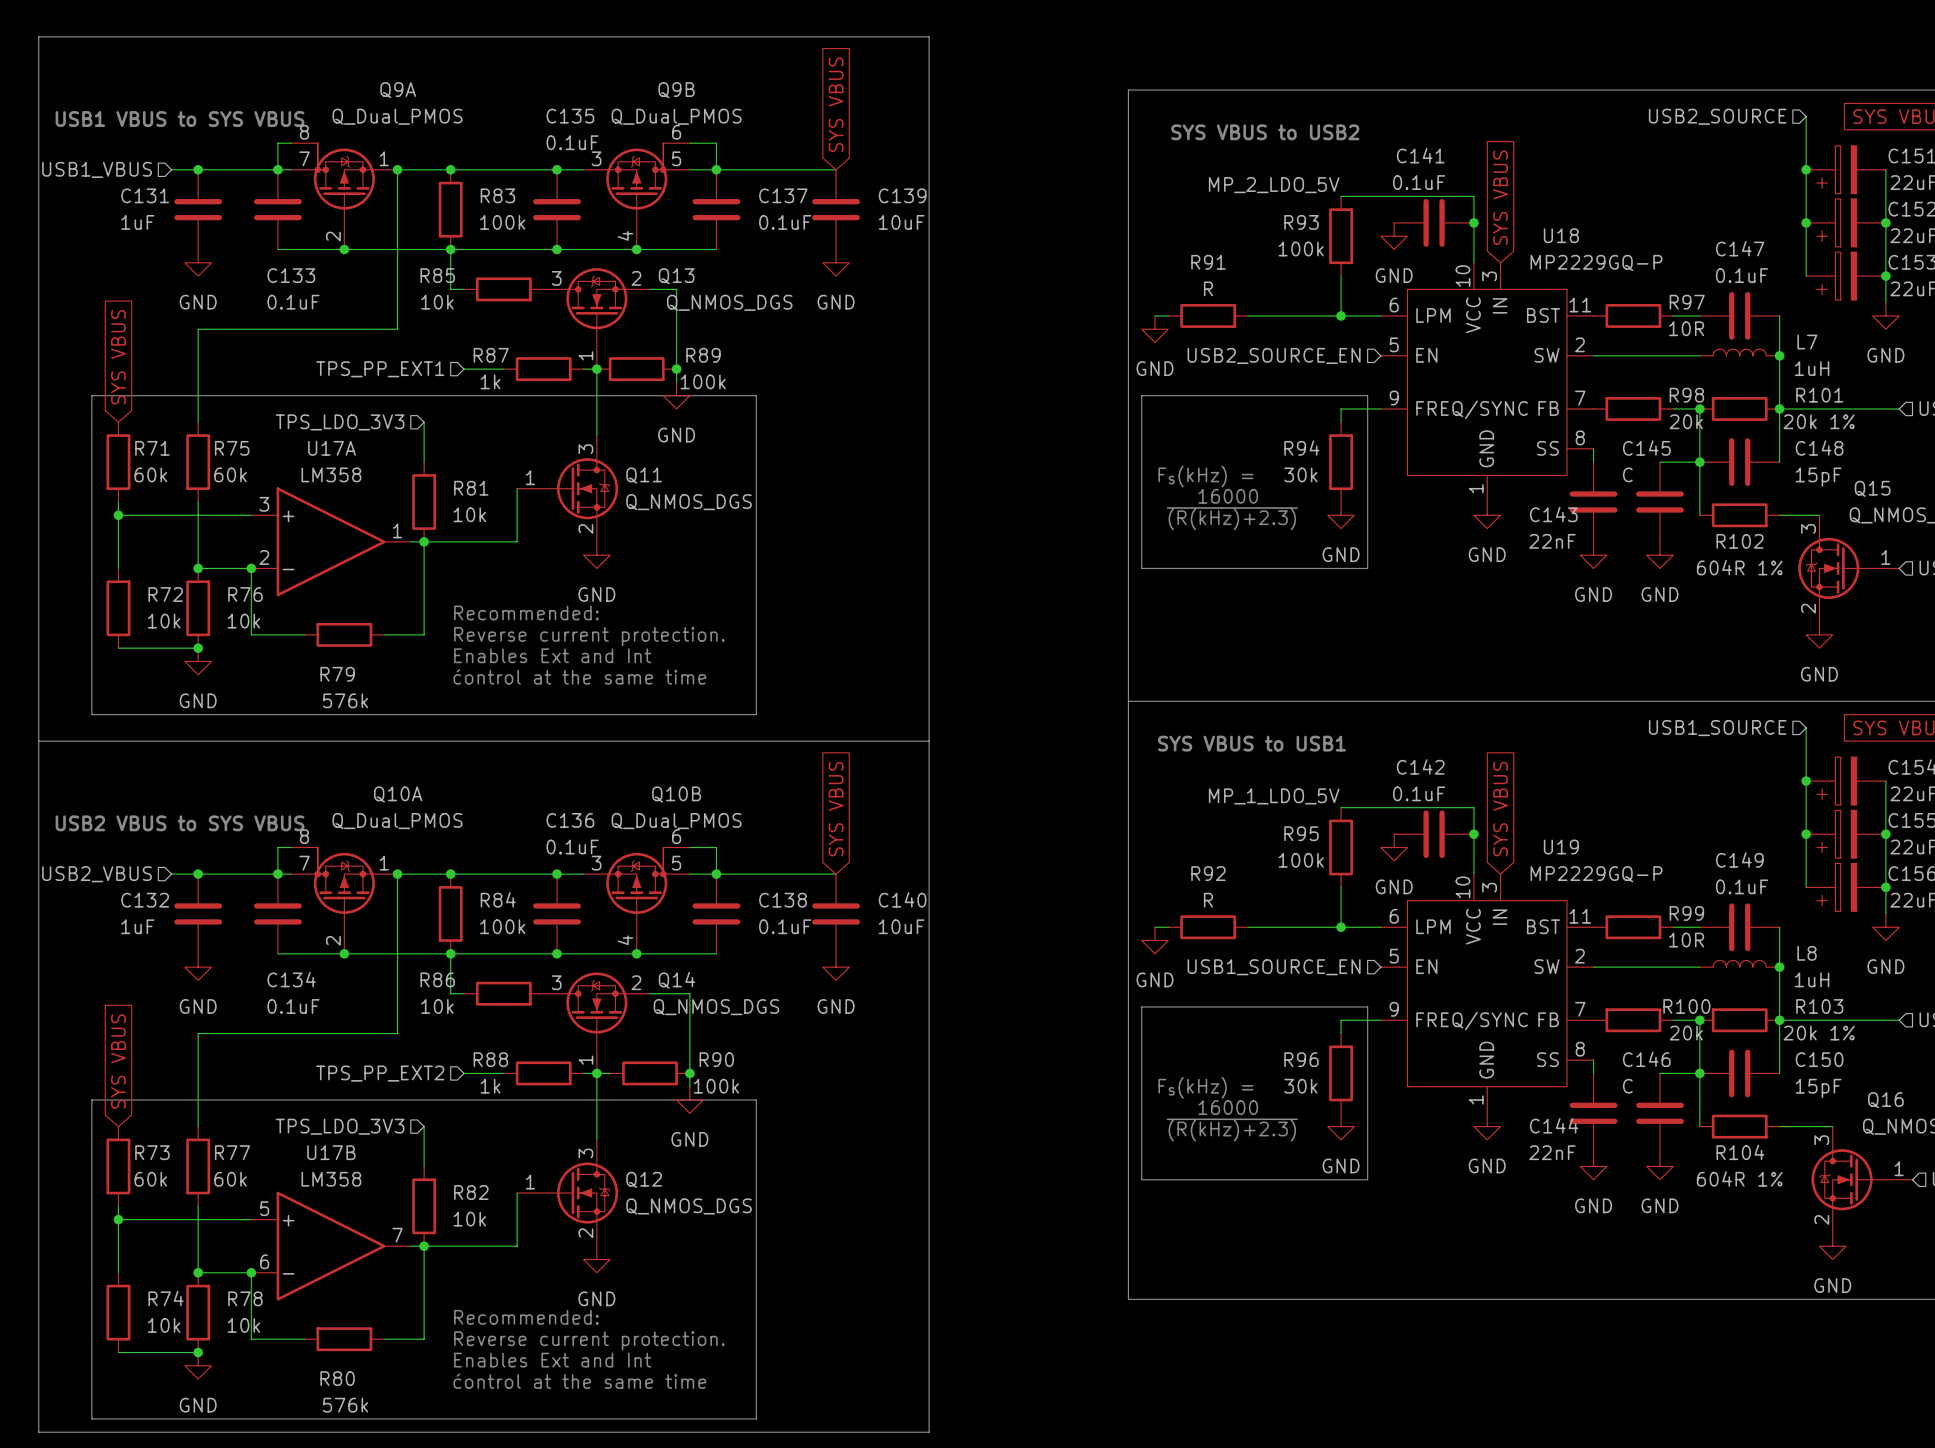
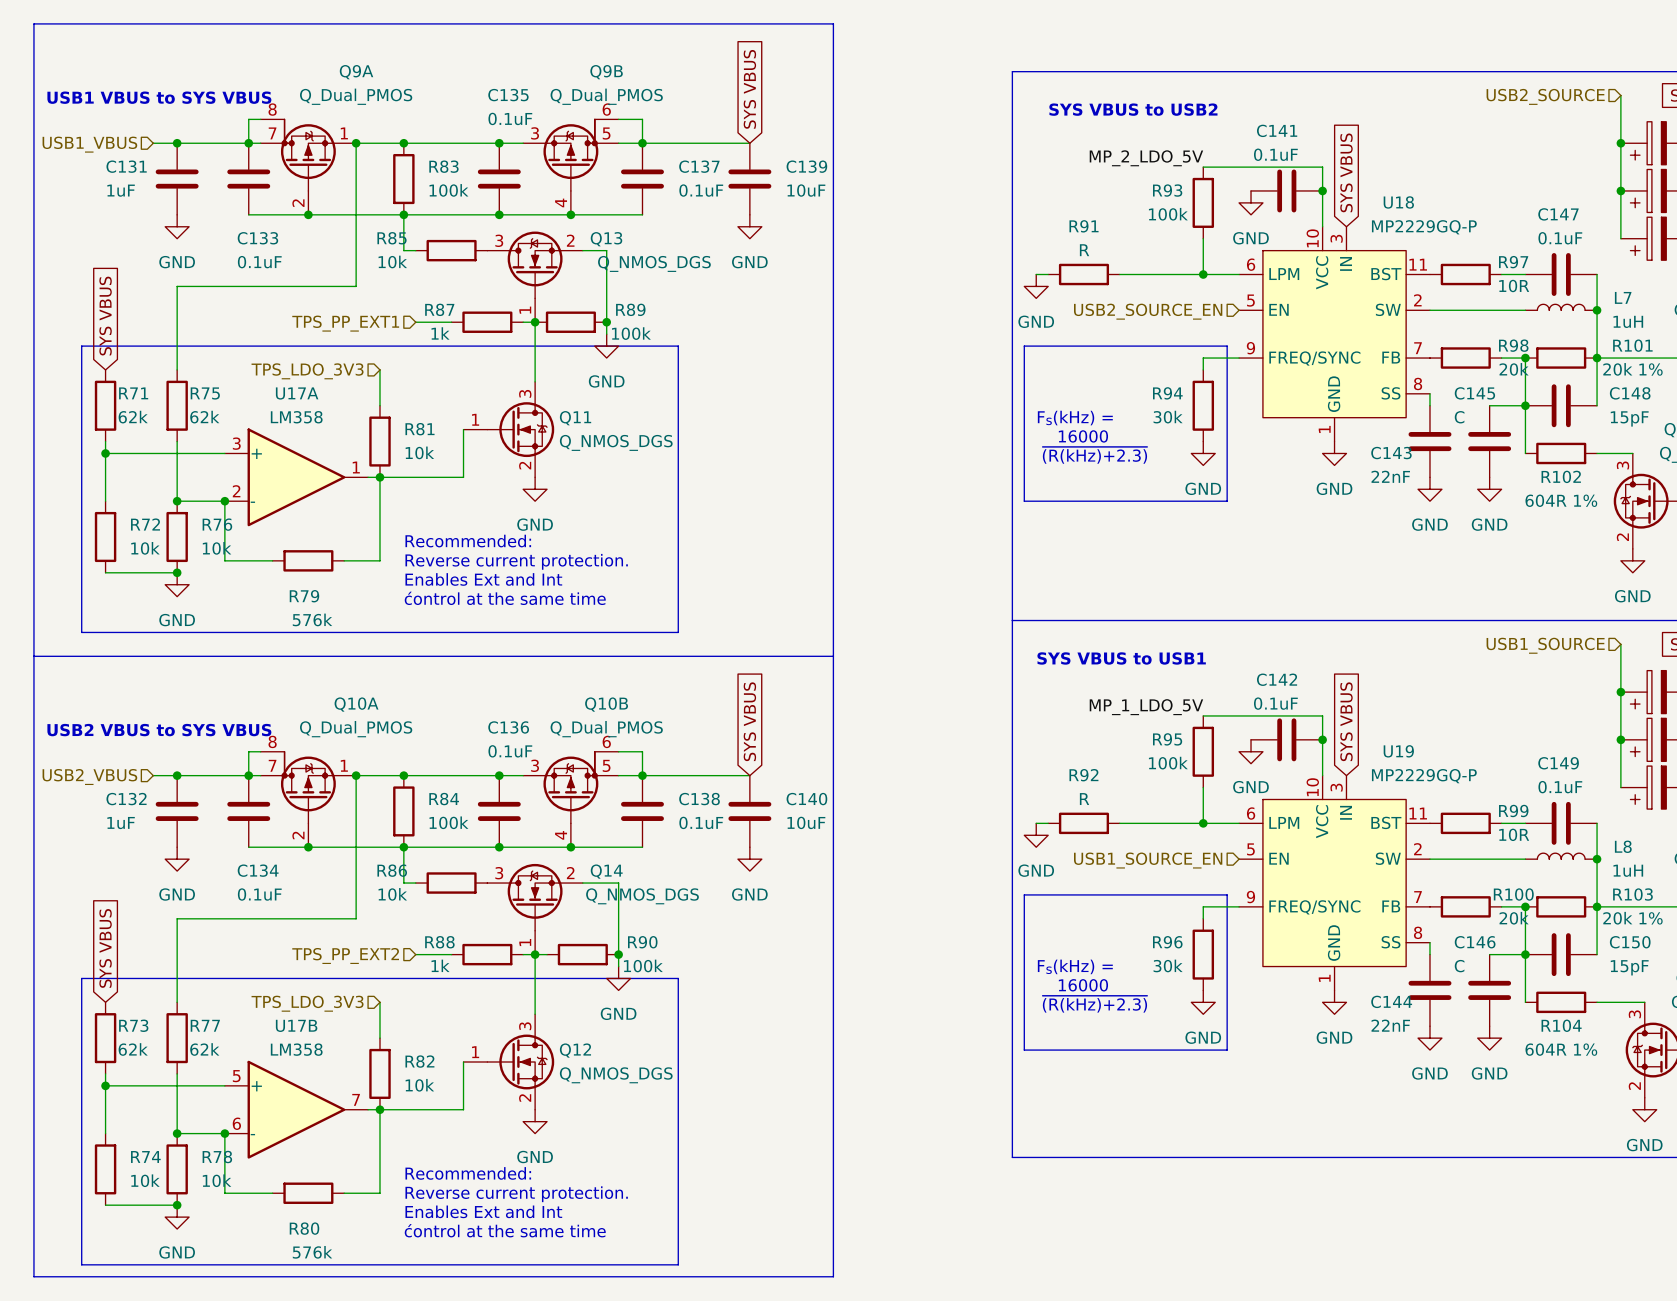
R71 value: 60k (150, 474) -> 62k (133, 417)
R75 value: 60k (230, 474) -> 62k (204, 417)
R73 value: 60k (150, 1179) -> 62k (133, 1049)
R77 value: 60k (230, 1179) -> 62k (204, 1049)

